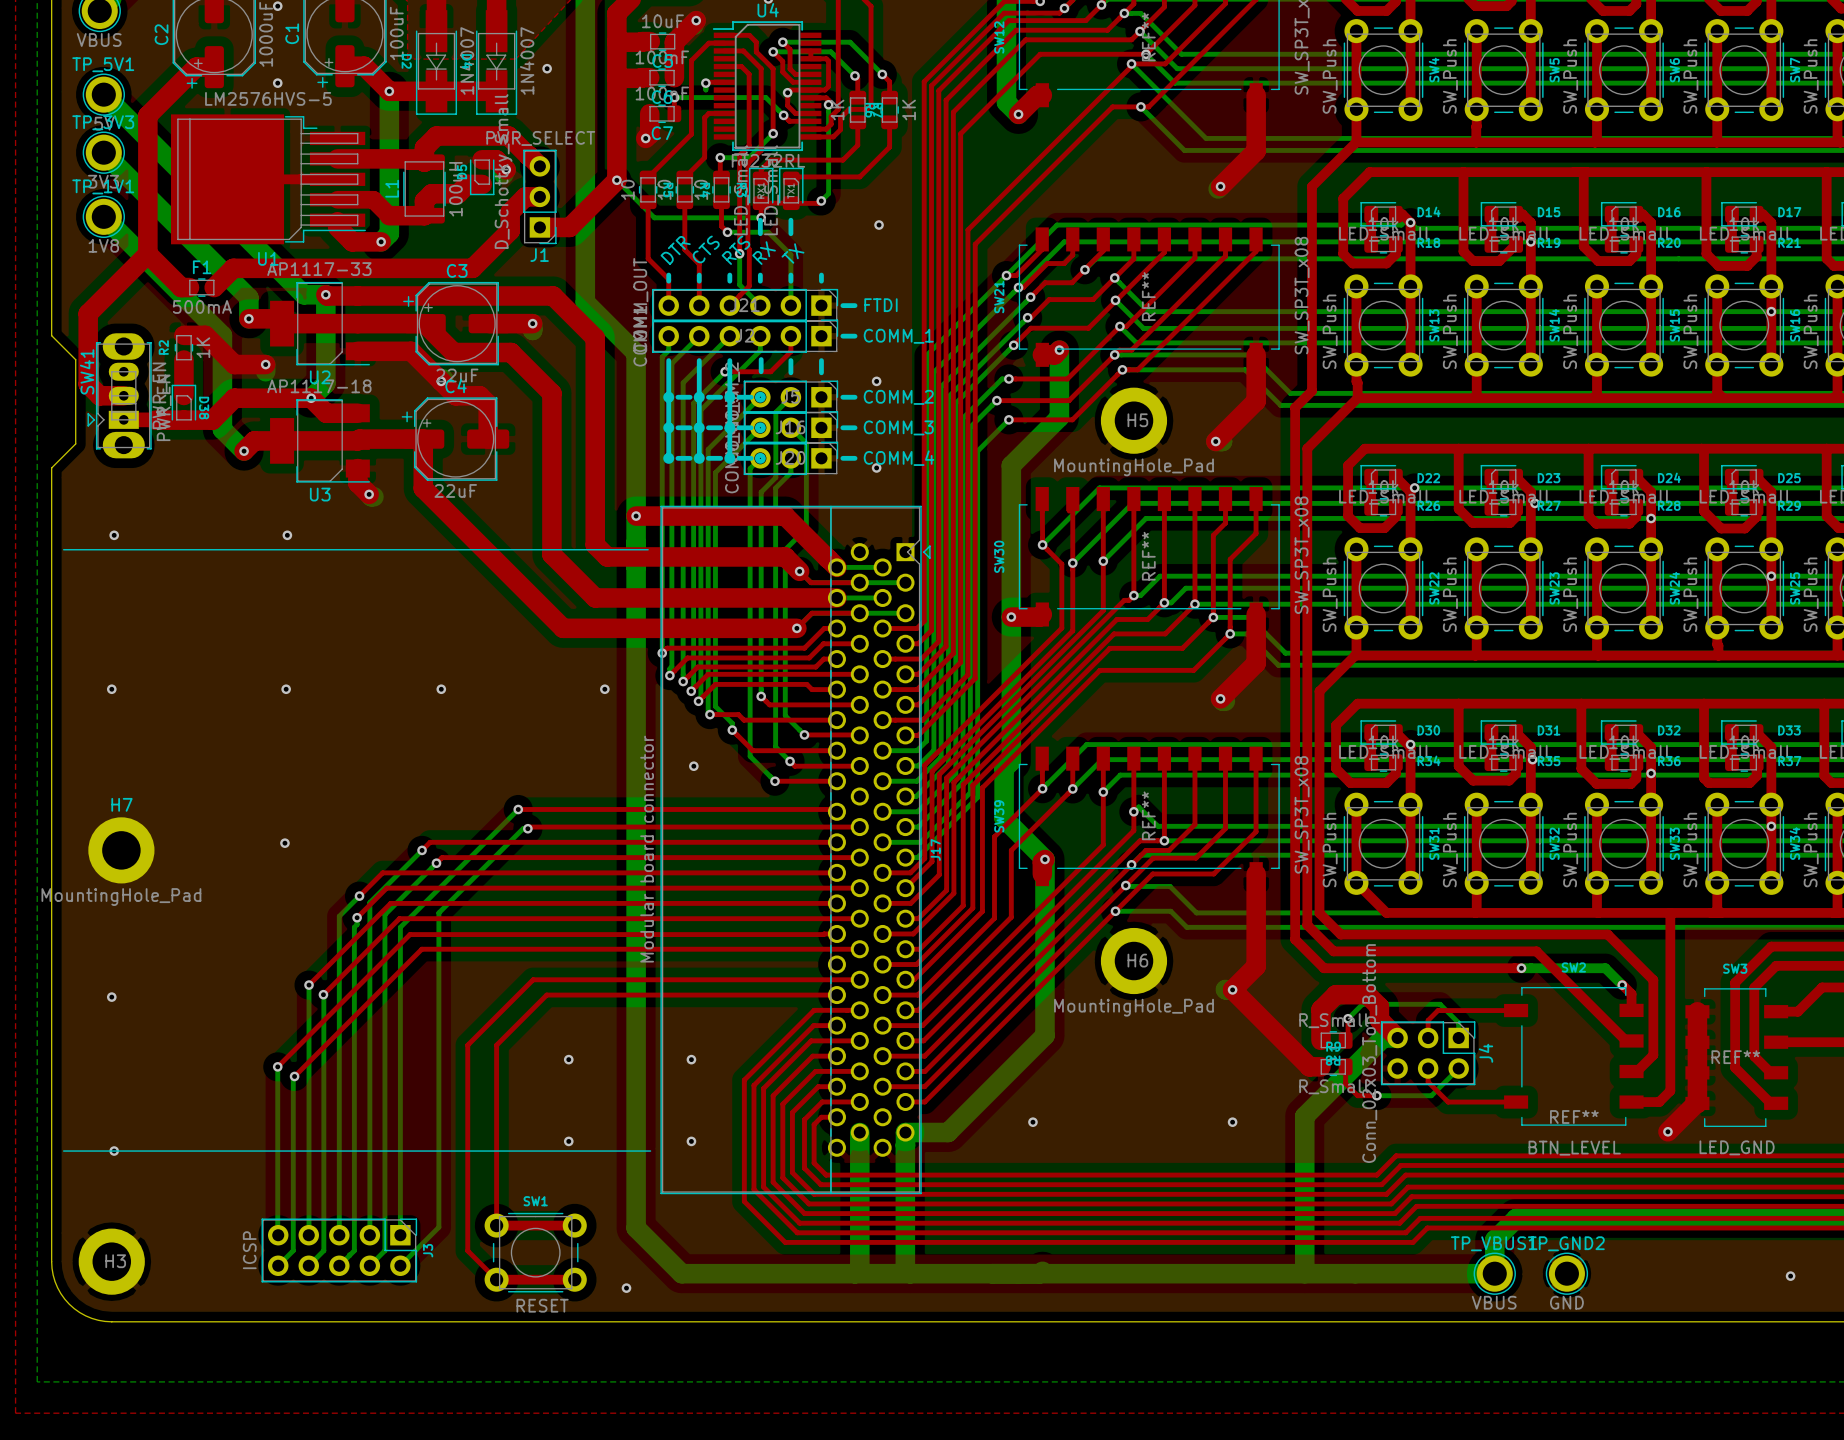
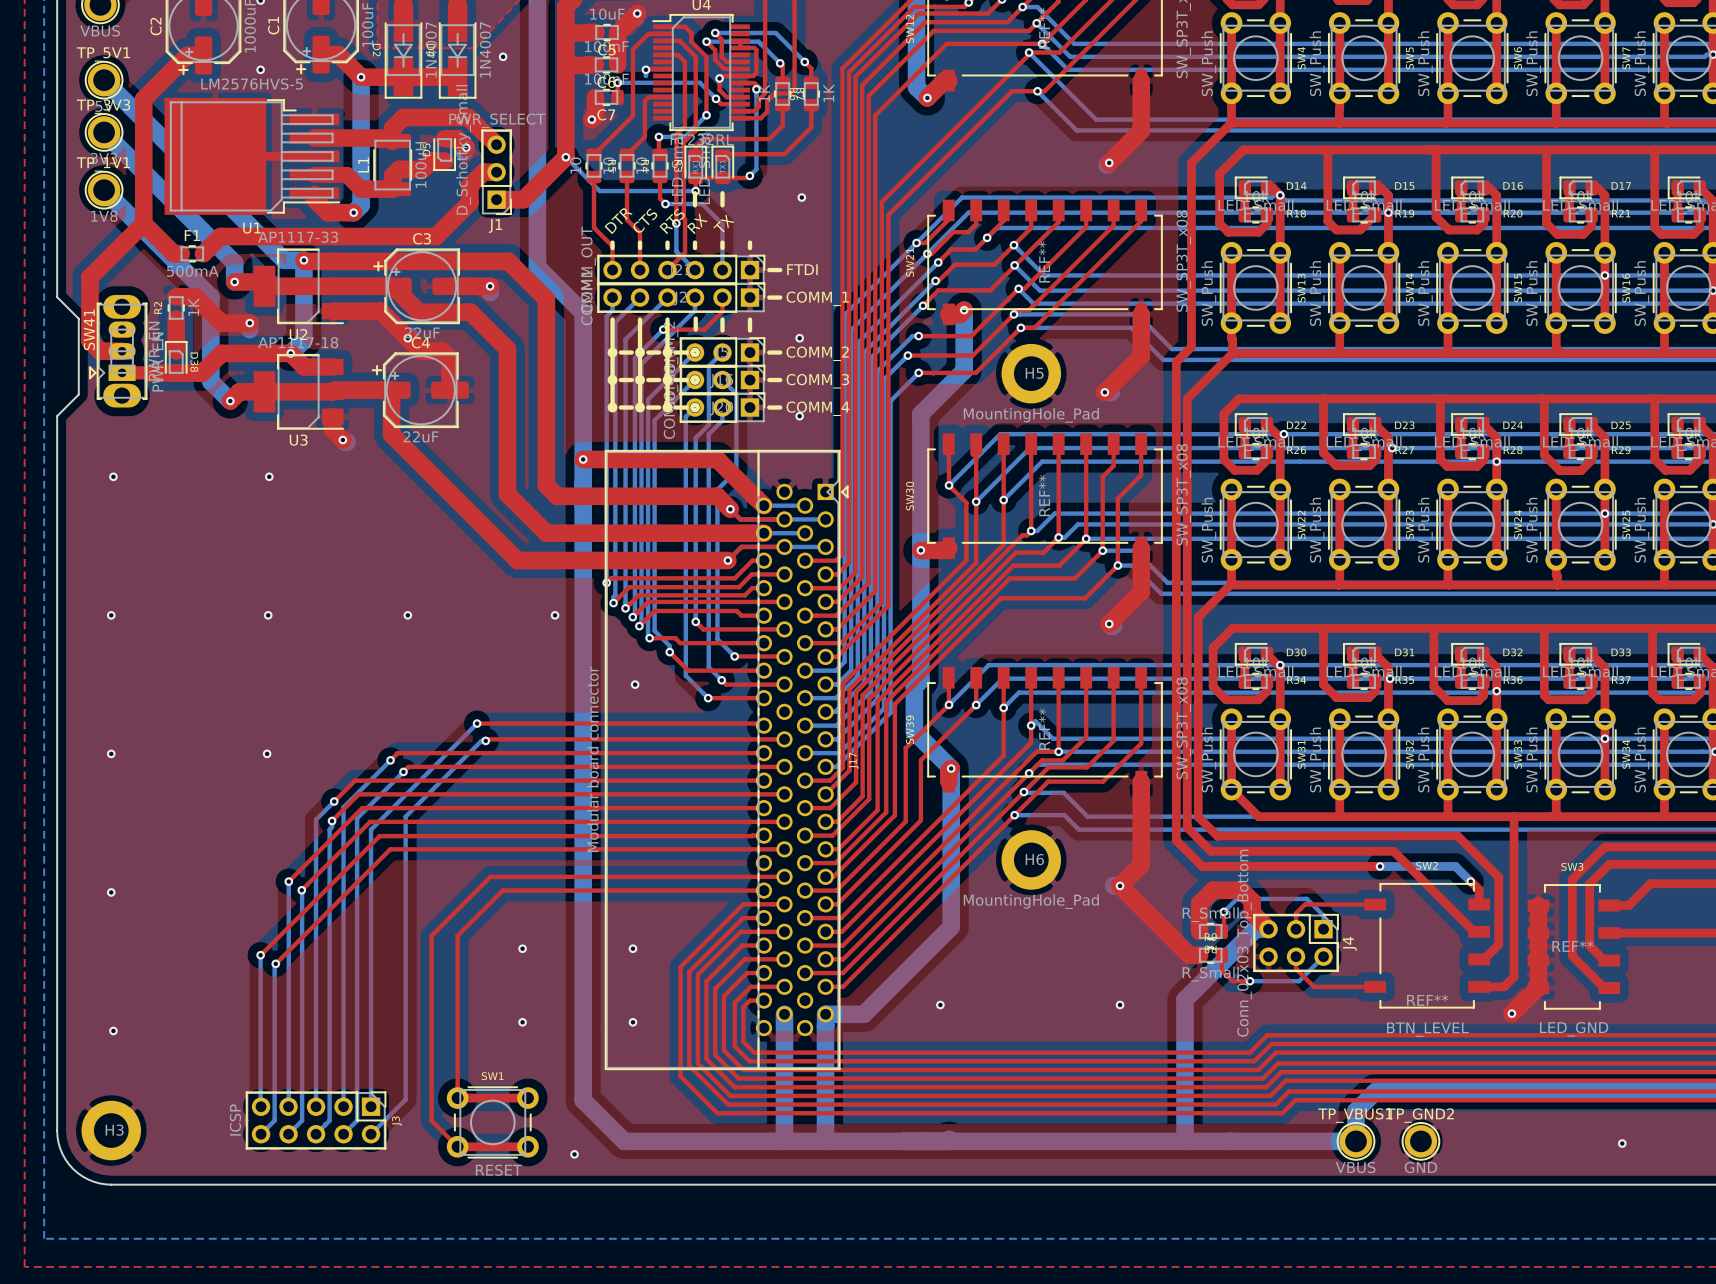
line: (63, 549) (648, 549) -> none
H7: MountingHole_Pad (121, 850) -> none
line: (63, 1151) (650, 1151) -> none

